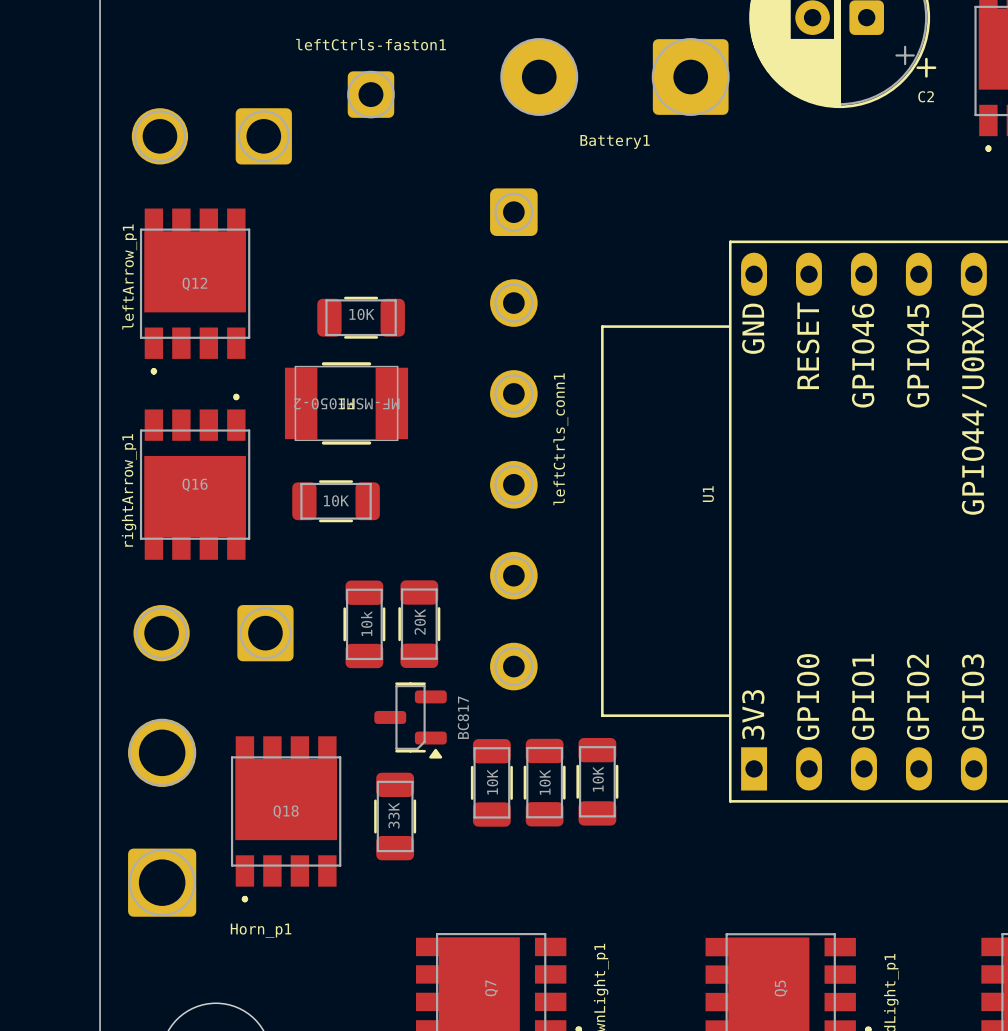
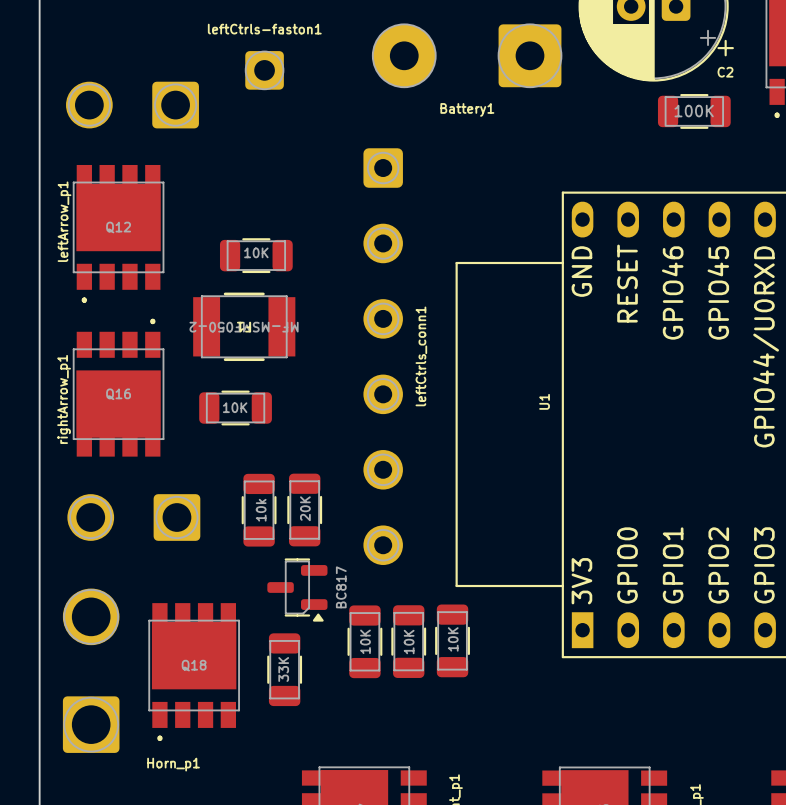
part: none -> 100K (694, 111)

